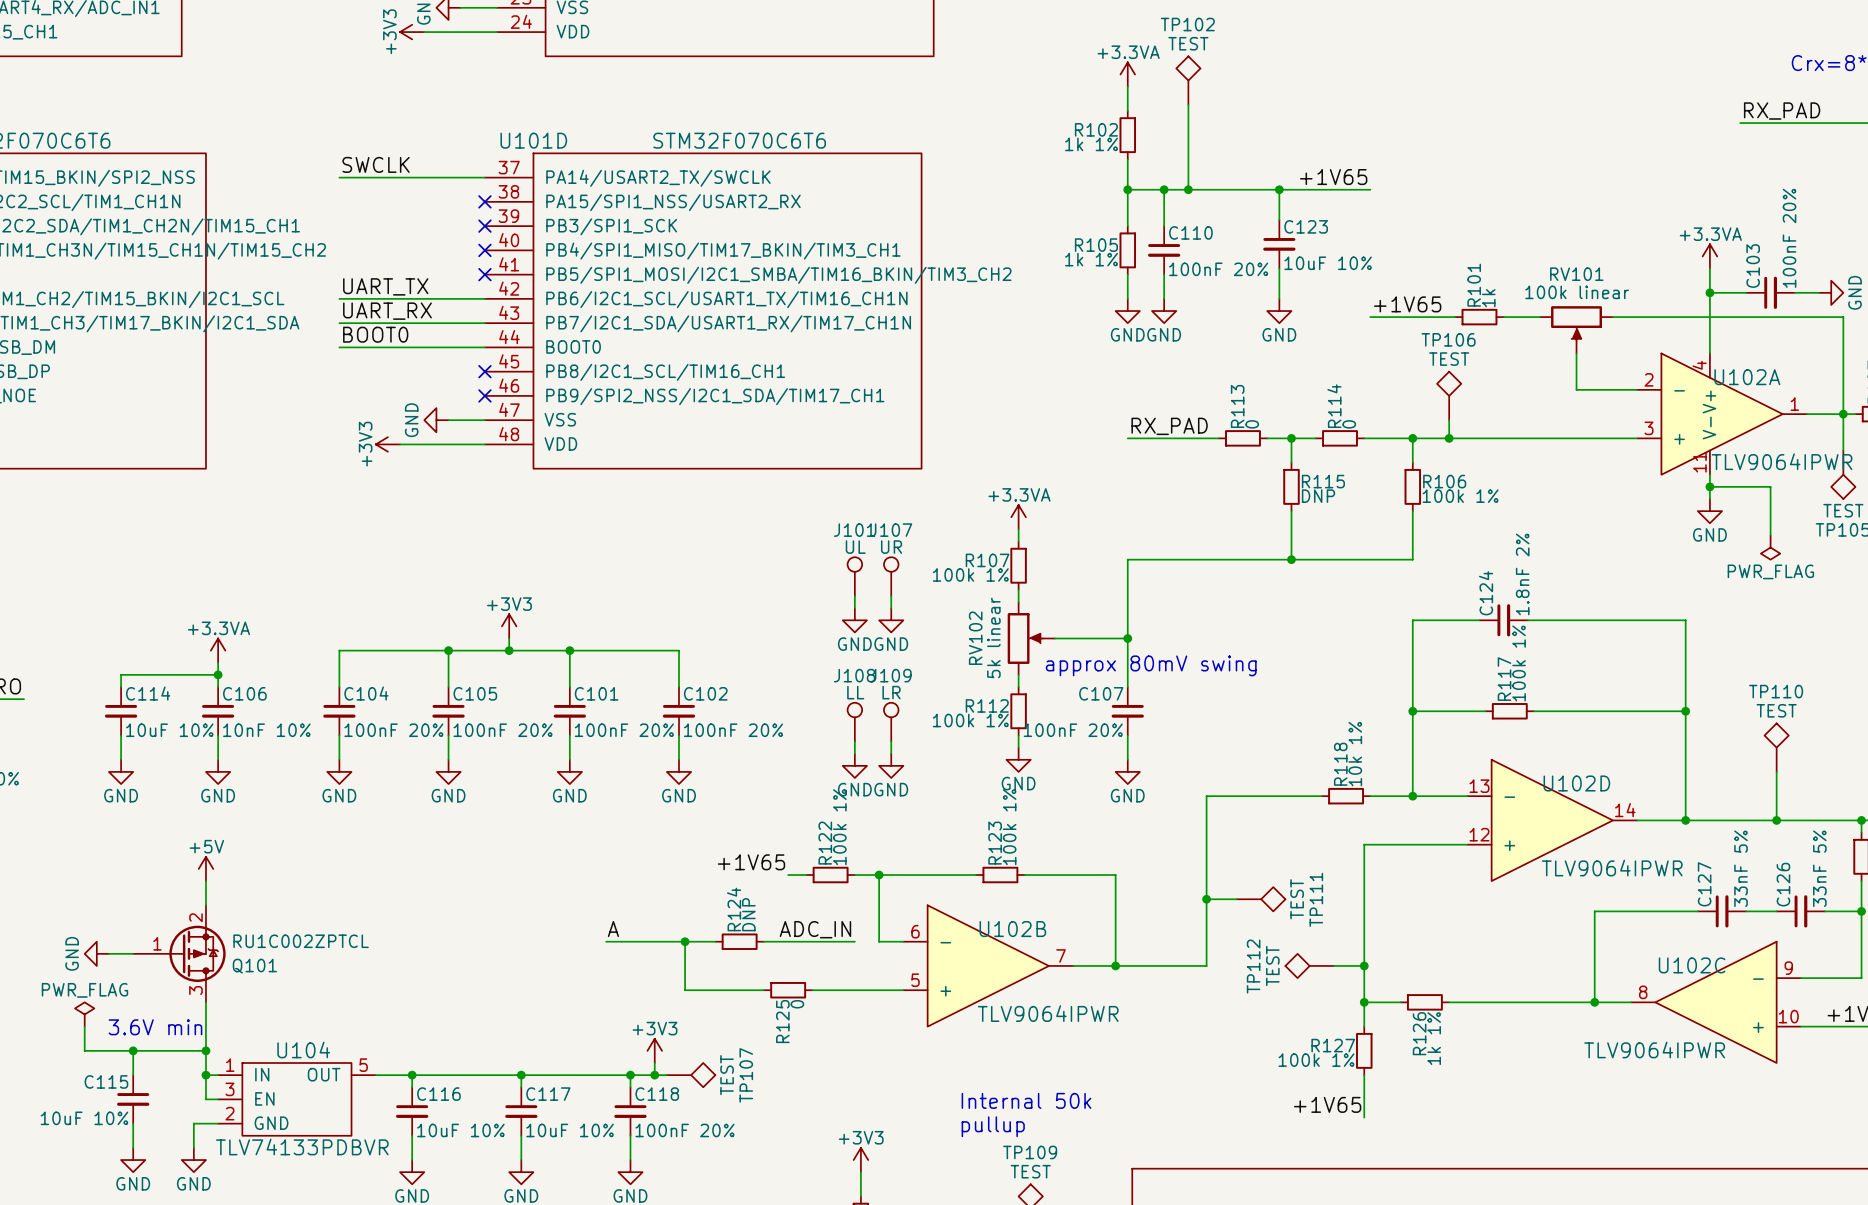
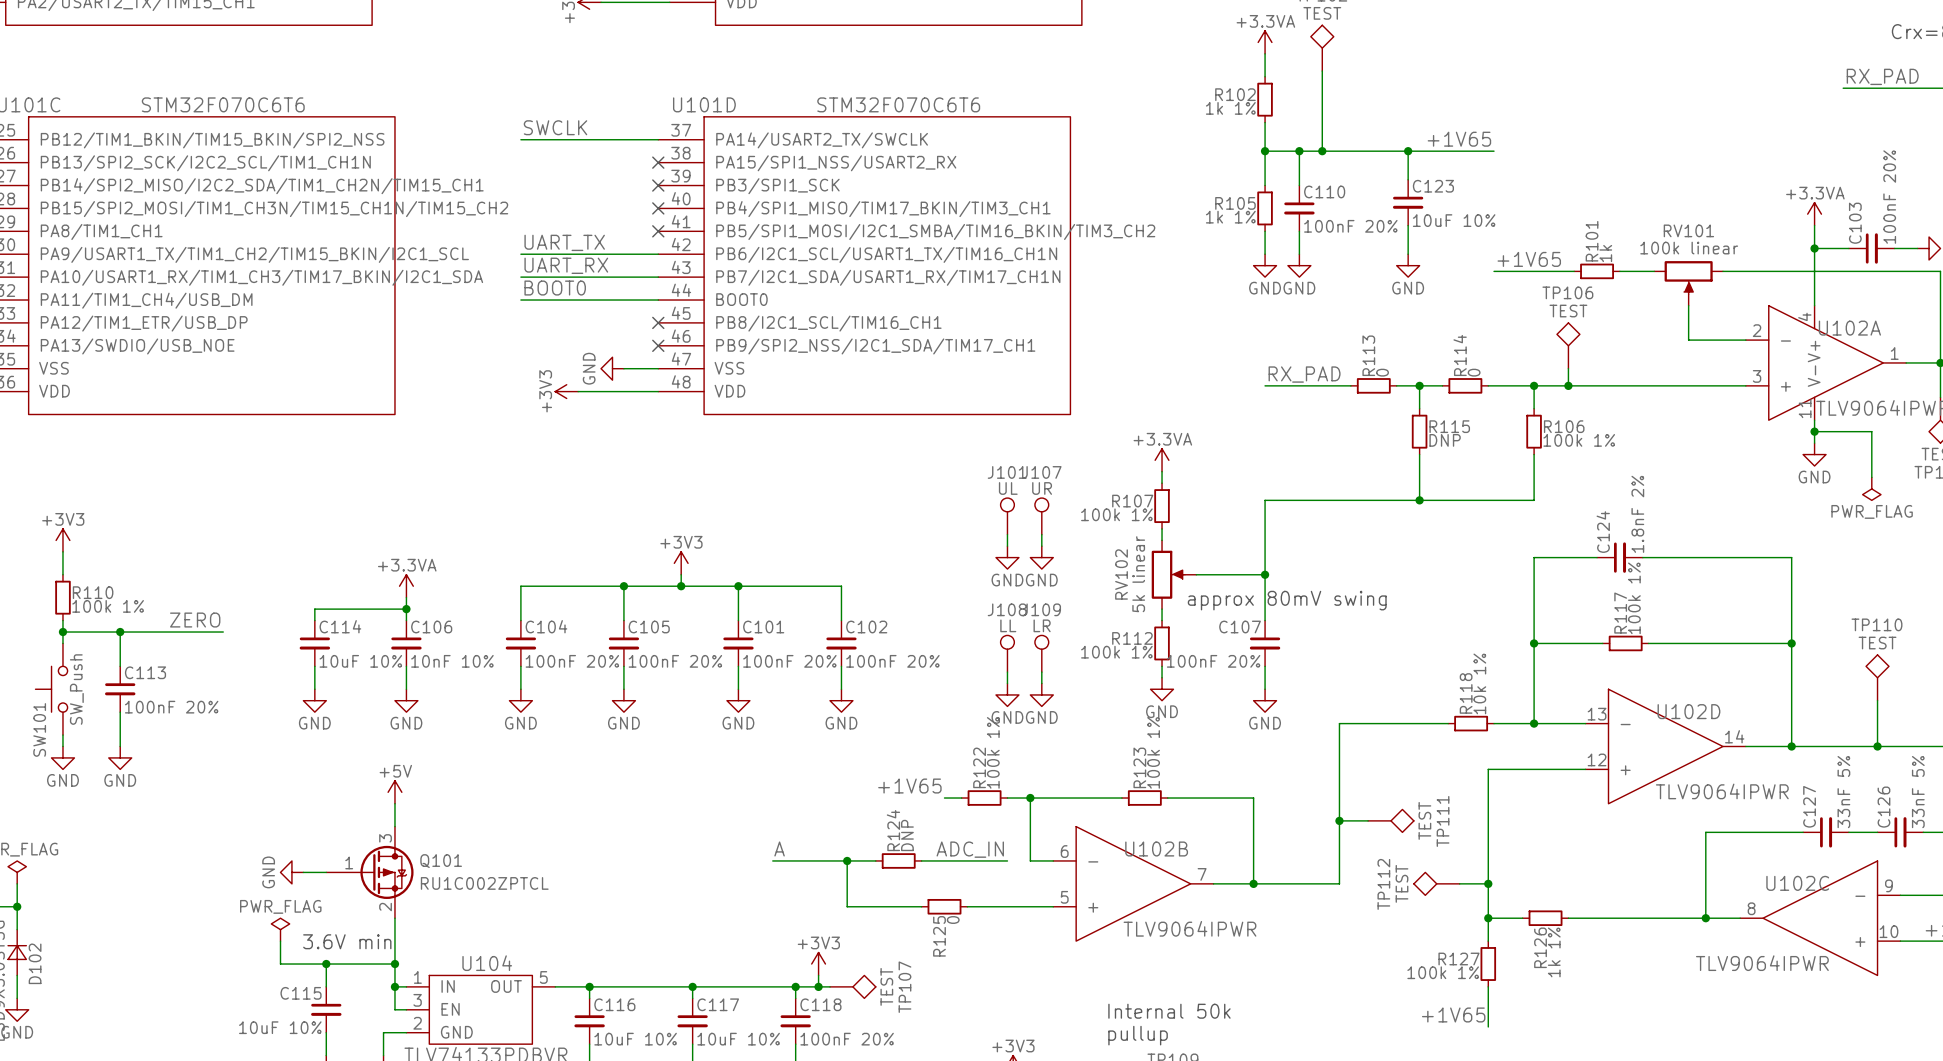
Q101 flip: as is (197, 953) -> up-down (386, 872)

